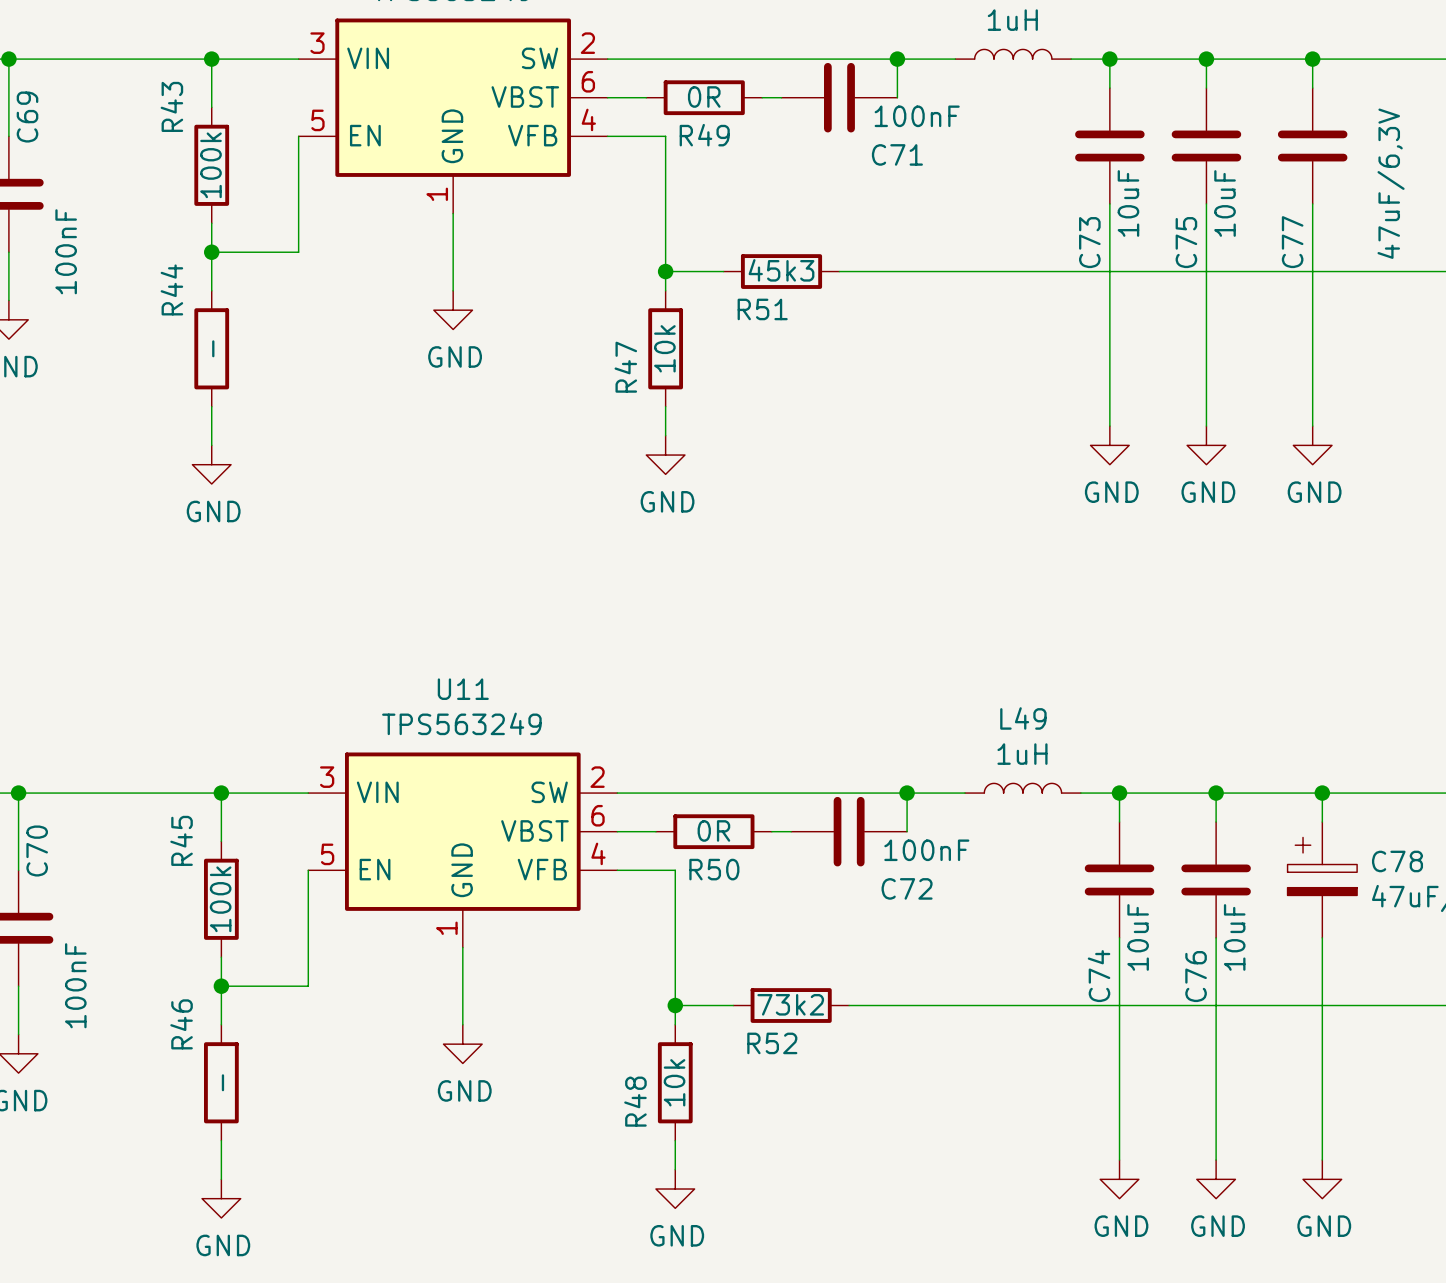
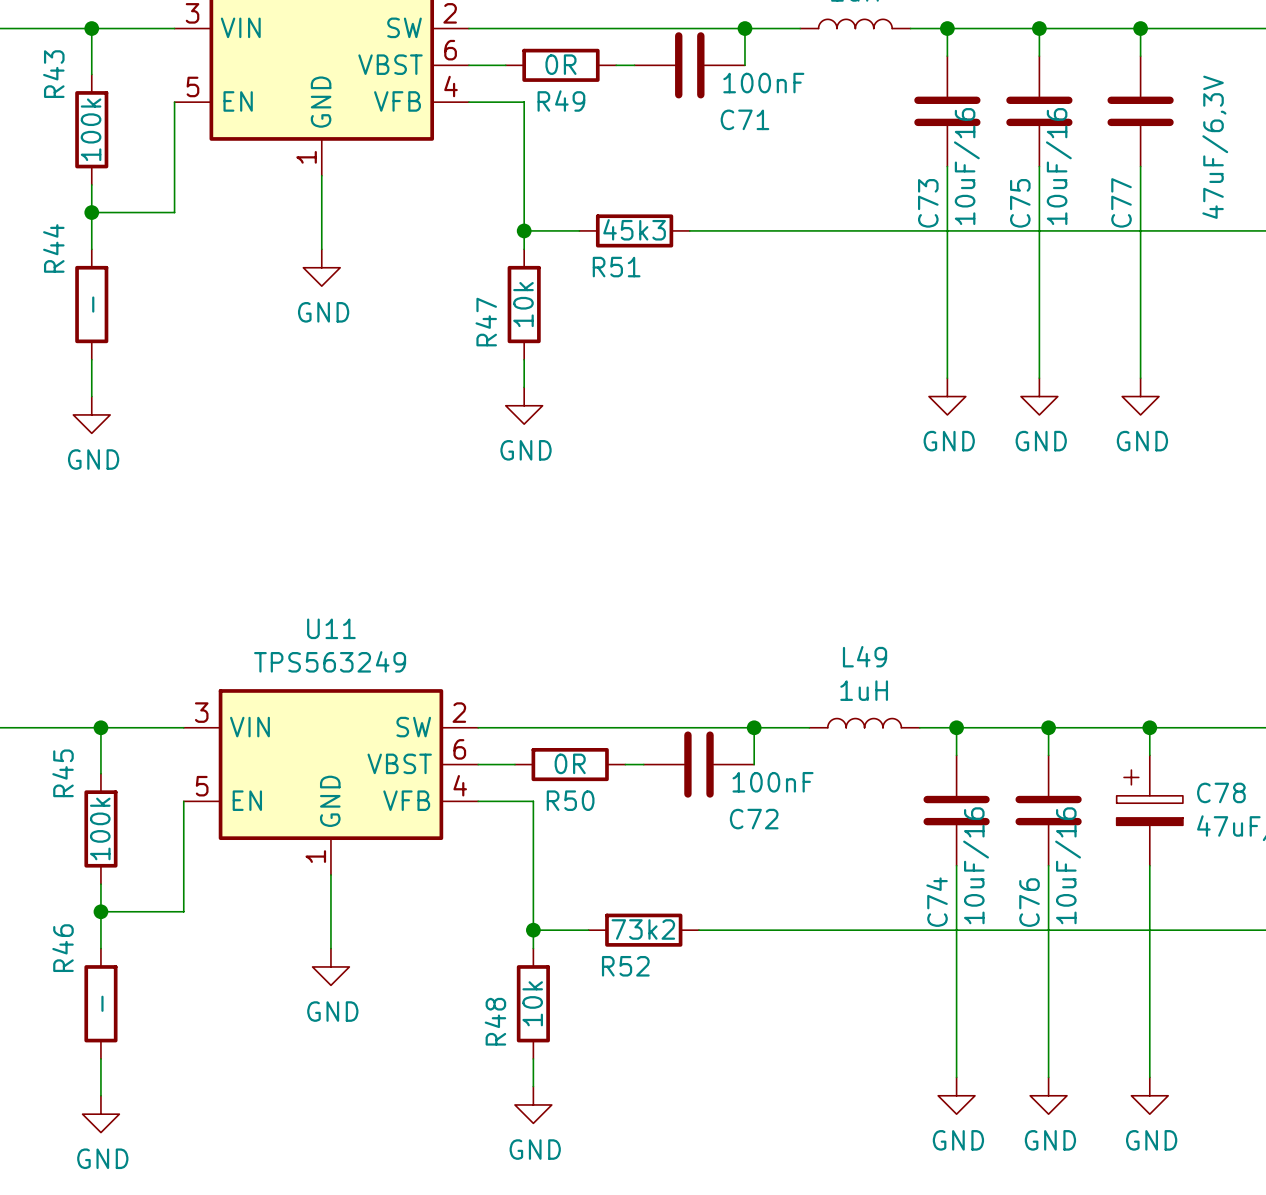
C73 value: 10uF (1128, 203) -> 10uF/16 (966, 166)
C75 value: 10uF (1225, 203) -> 10uF/16 (1058, 166)
C74 value: 10uF (1138, 937) -> 10uF/16 (976, 865)
C76 value: 10uF (1234, 937) -> 10uF/16 (1068, 865)

